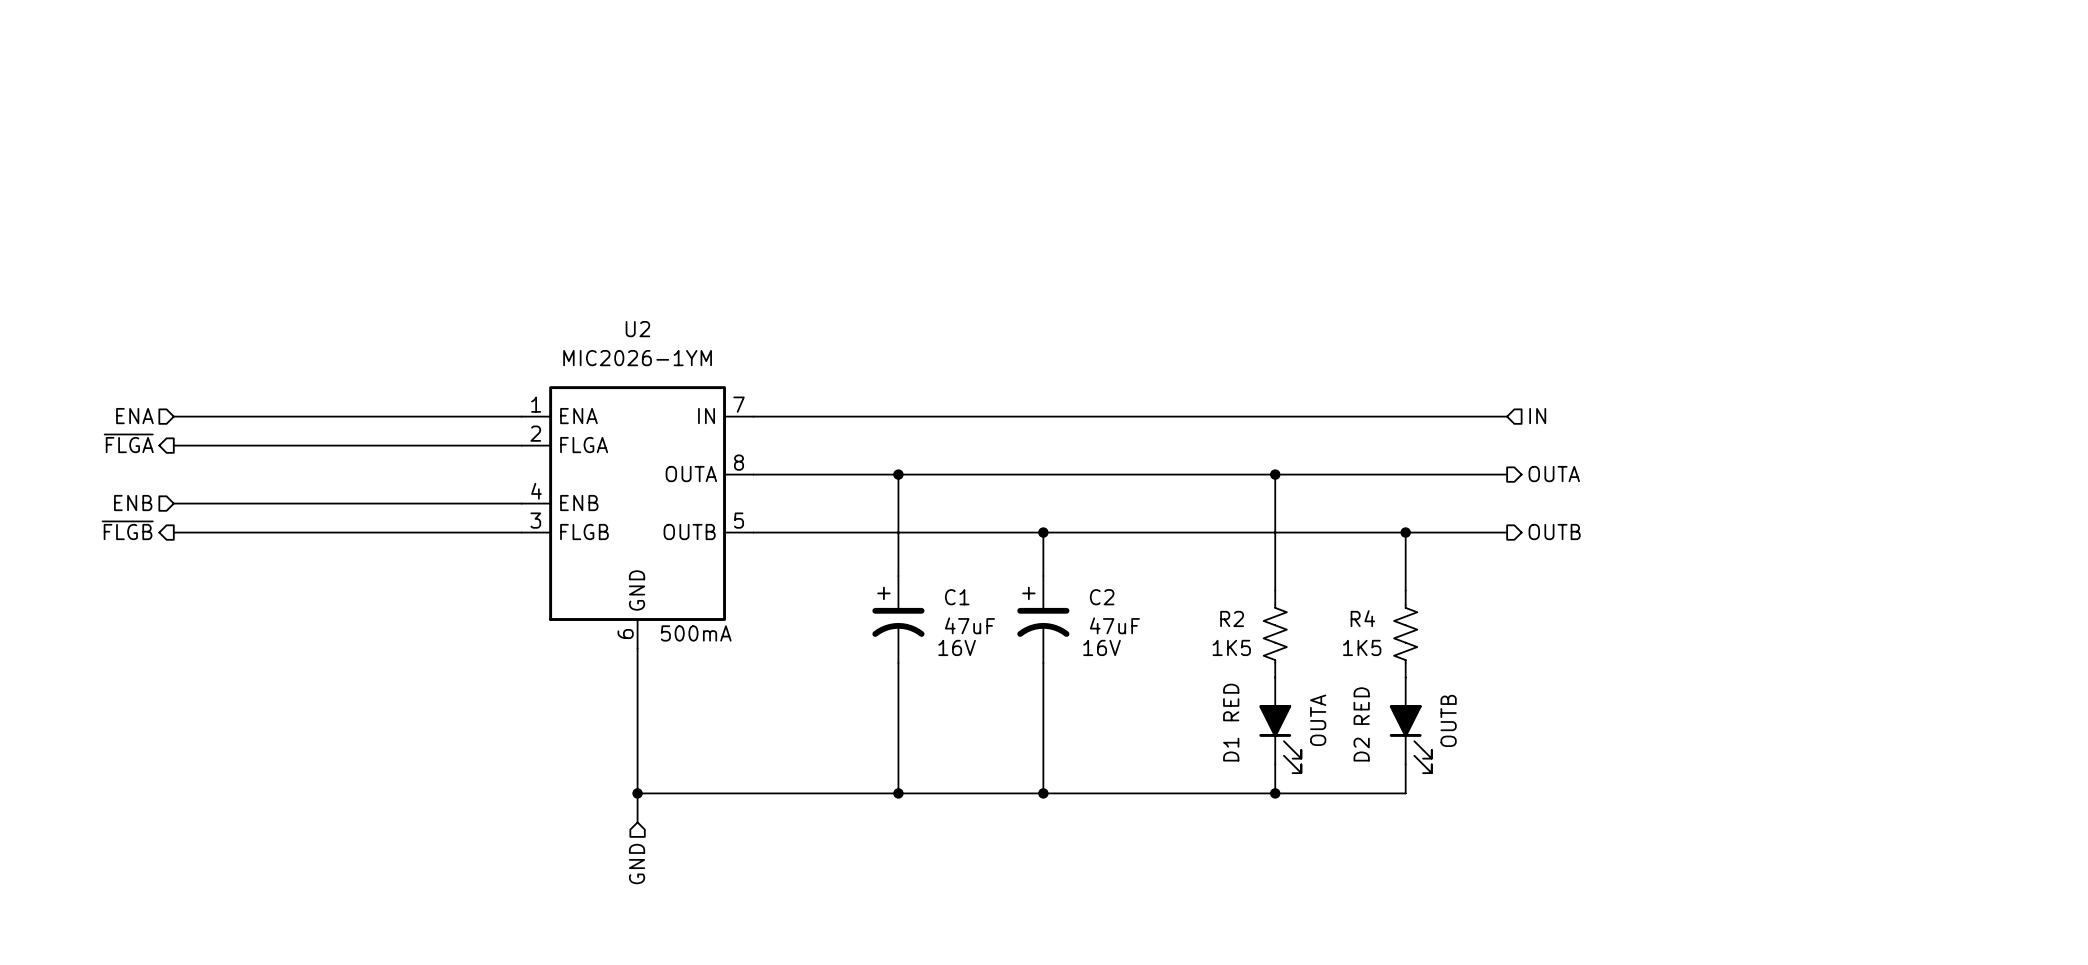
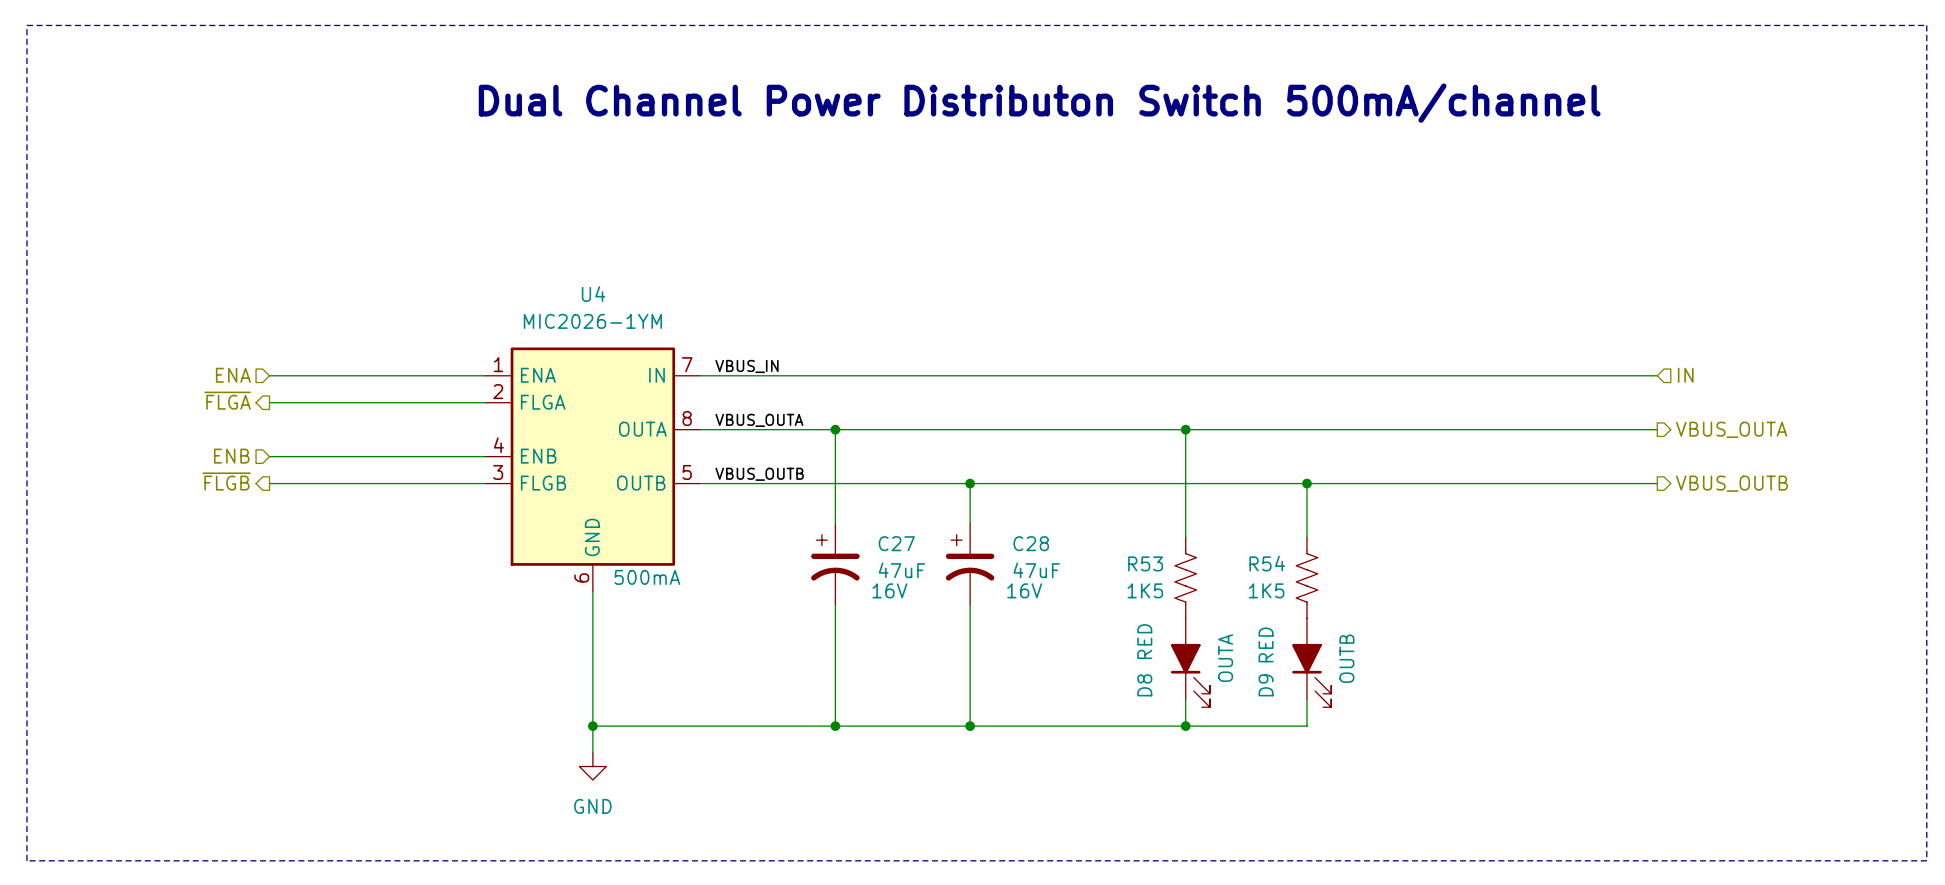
line: none -> (26, 25) (1926, 25) (1926, 860) (26, 860) (26, 25)
text: none -> Dual Channel Power Distributon Switch 500mA/channel (1039, 103)
U2 name: U2 (637, 329) -> U4 (593, 294)
label: none -> VBUS_IN (747, 366)
hierarchical label position: ENA (134, 416) -> ENA (233, 375)
wire: (173, 416) (289, 416) -> none
wire: none -> (1401, 375) (1657, 375)
hierarchical label position: IN (1537, 416) -> IN (1685, 375)
hierarchical label position: ~{FLGA} (128, 443) -> ~{FLGA} (227, 400)
wire: (173, 445) (289, 445) -> none
label: none -> VBUS_OUTA (759, 420)
wire: none -> (1401, 429) (1657, 429)
hierarchical label: OUTA (1554, 474) -> none
hierarchical label: none -> VBUS_OUTA (1731, 429)
hierarchical label position: ENB (133, 503) -> ENB (231, 456)
wire: (173, 503) (289, 503) -> none
label: none -> VBUS_OUTB (759, 474)
hierarchical label position: ~{FLGB} (127, 530) -> ~{FLGB} (226, 481)
wire: (173, 532) (289, 532) -> none
wire: none -> (1401, 483) (1657, 483)
hierarchical label: OUTB (1554, 532) -> none
hierarchical label: none -> VBUS_OUTB (1731, 483)
C1 name: C1 (957, 597) -> C27 (896, 543)
C2 name: C2 (1102, 597) -> C28 (1031, 543)
R2 name: R2 (1232, 618) -> R53 (1145, 563)
R4 name: R4 (1362, 618) -> R54 (1267, 563)
D1 name: D1 (1231, 749) -> D8 (1144, 685)
D2 name: D2 (1361, 749) -> D9 (1266, 685)
power symbol: none -> GND (592, 766)
hierarchical label: GND (637, 864) -> none

